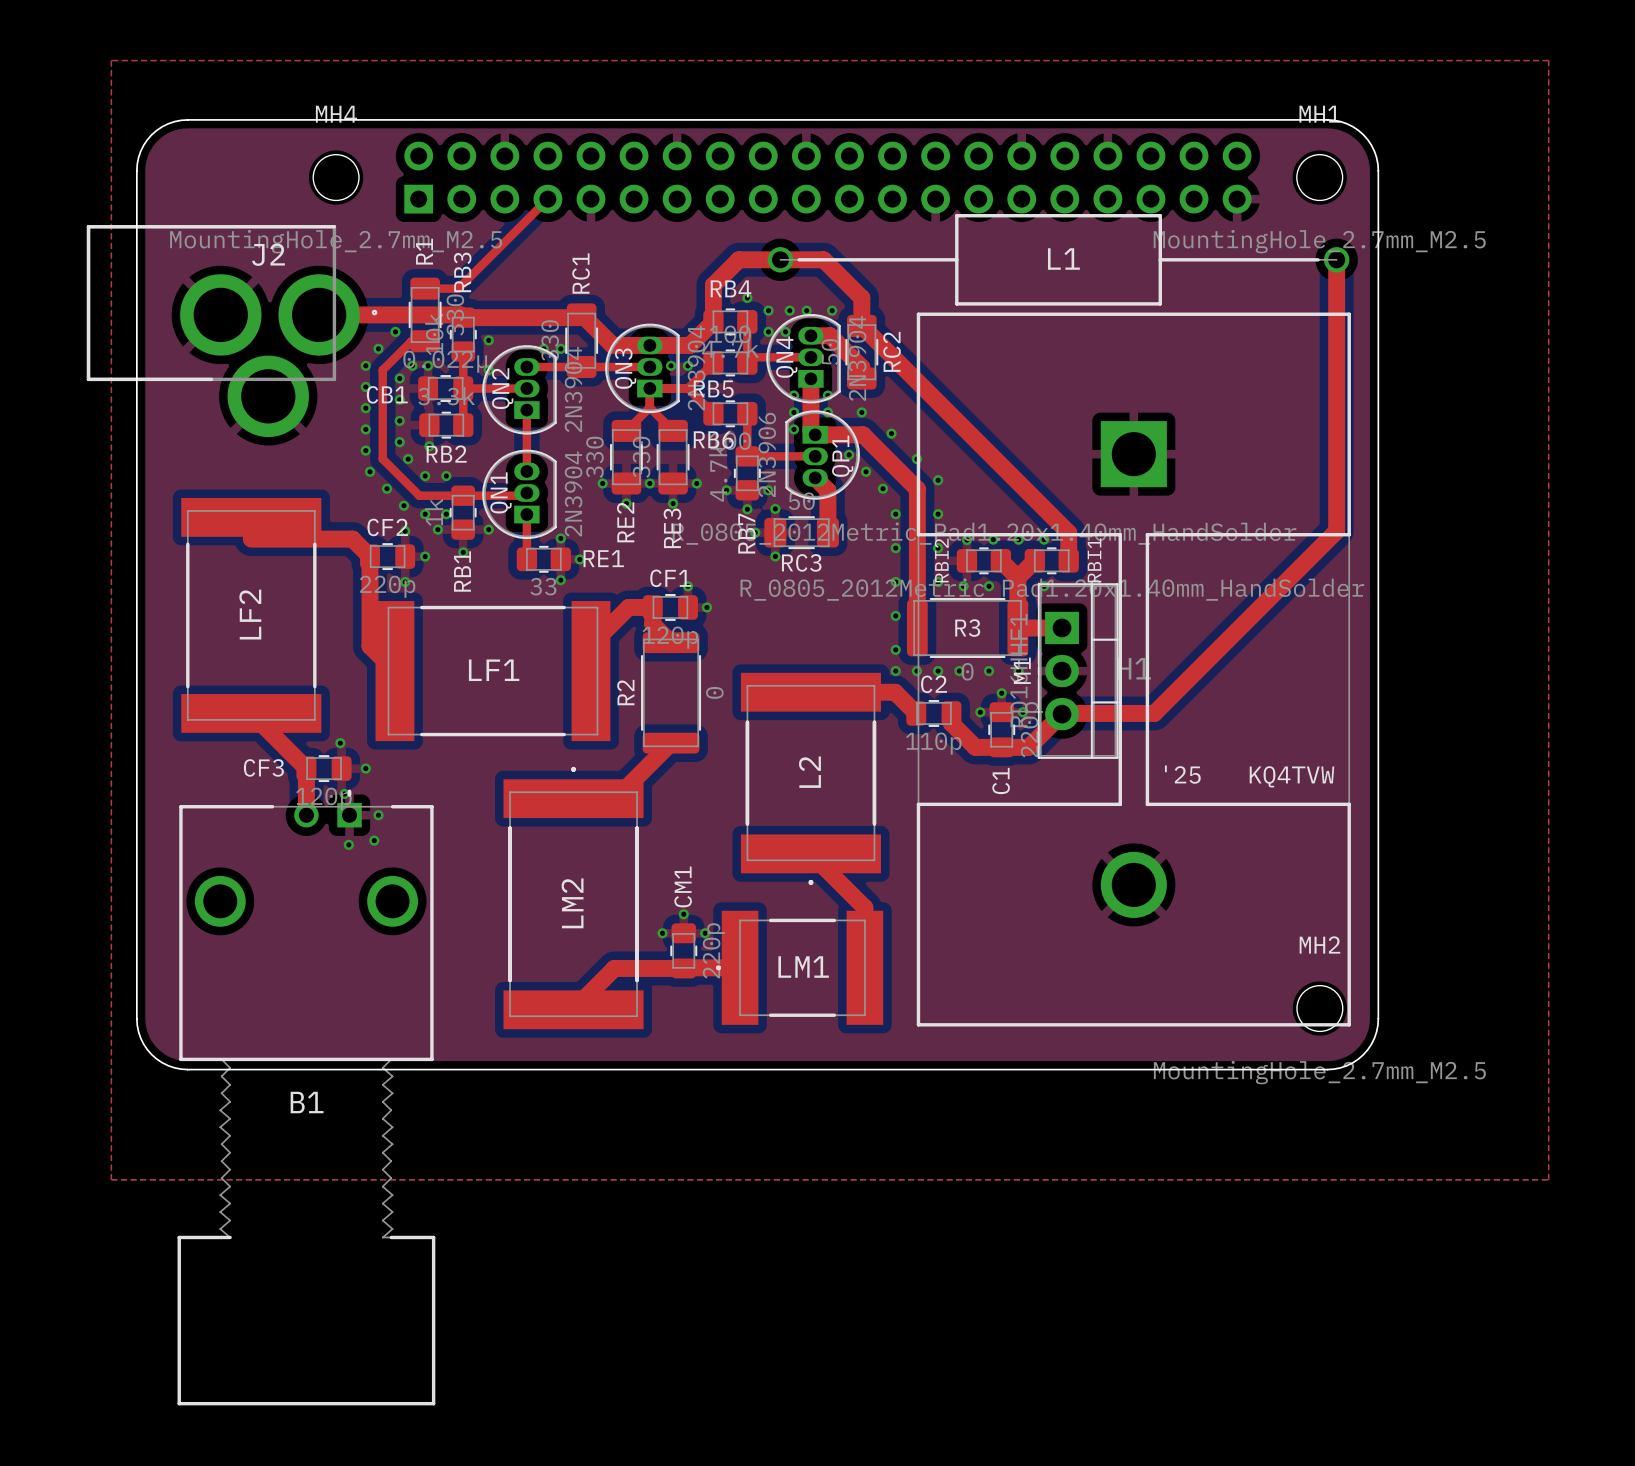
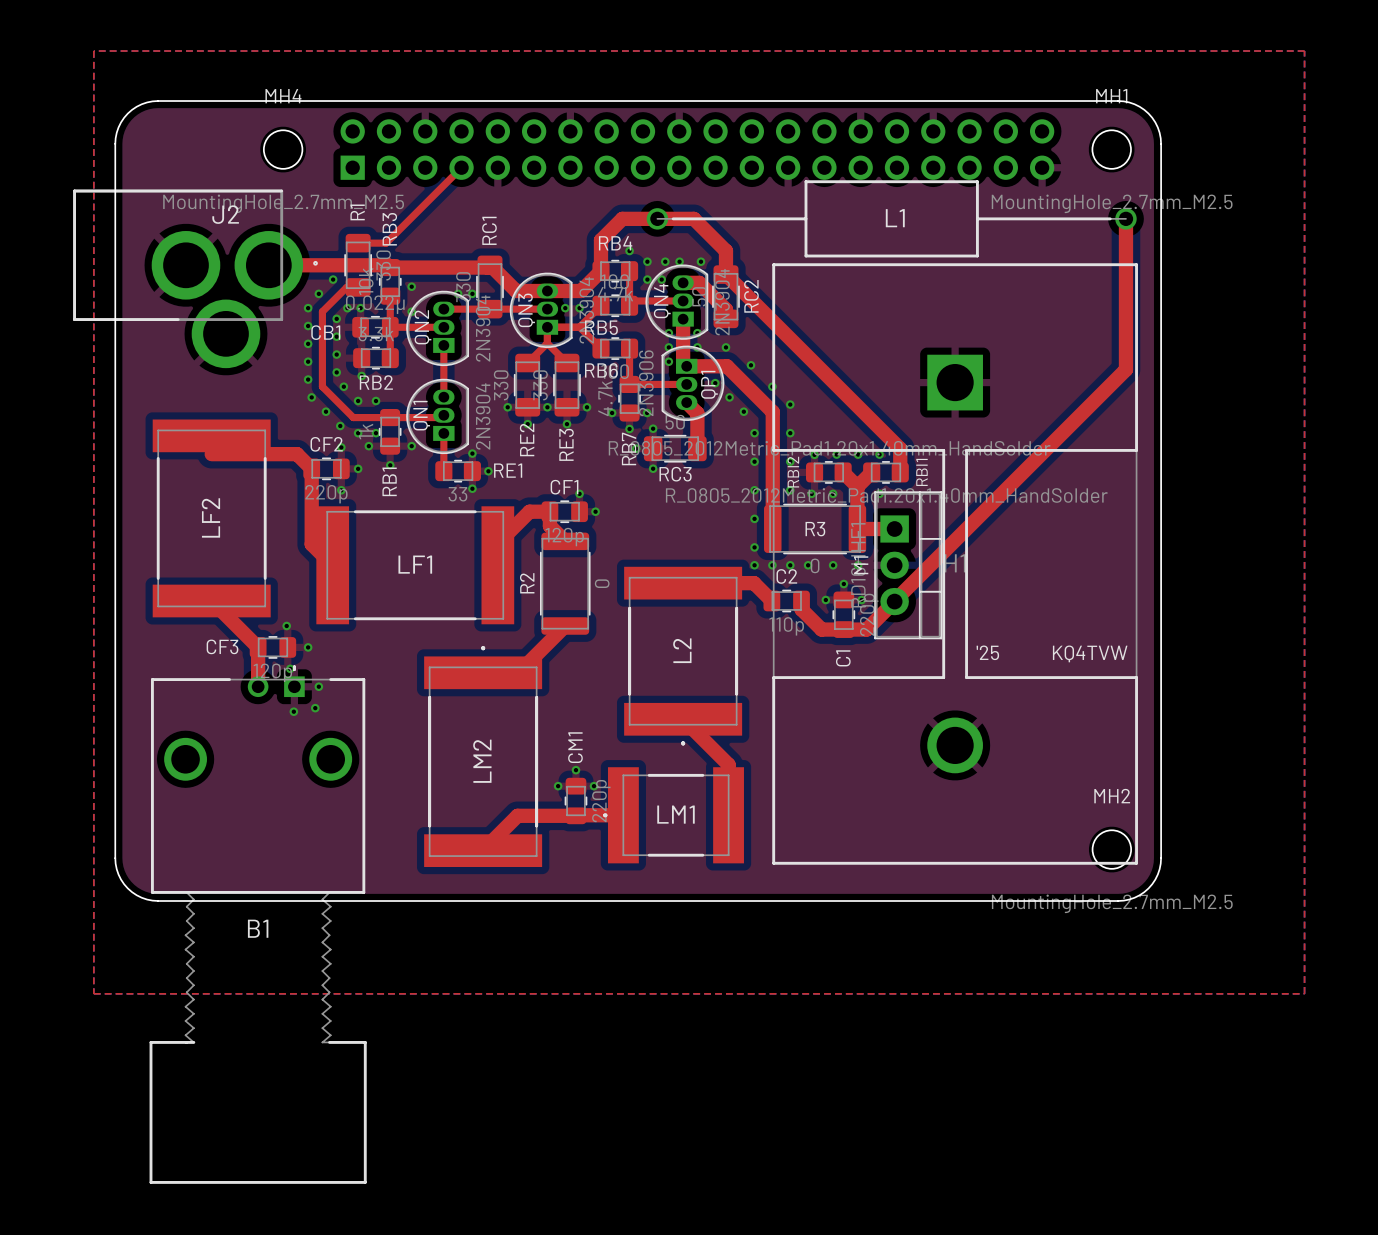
top track: (1336, 438) (1336, 531) (1154, 713) (1062, 713) -> (1125, 369) (894, 601)

